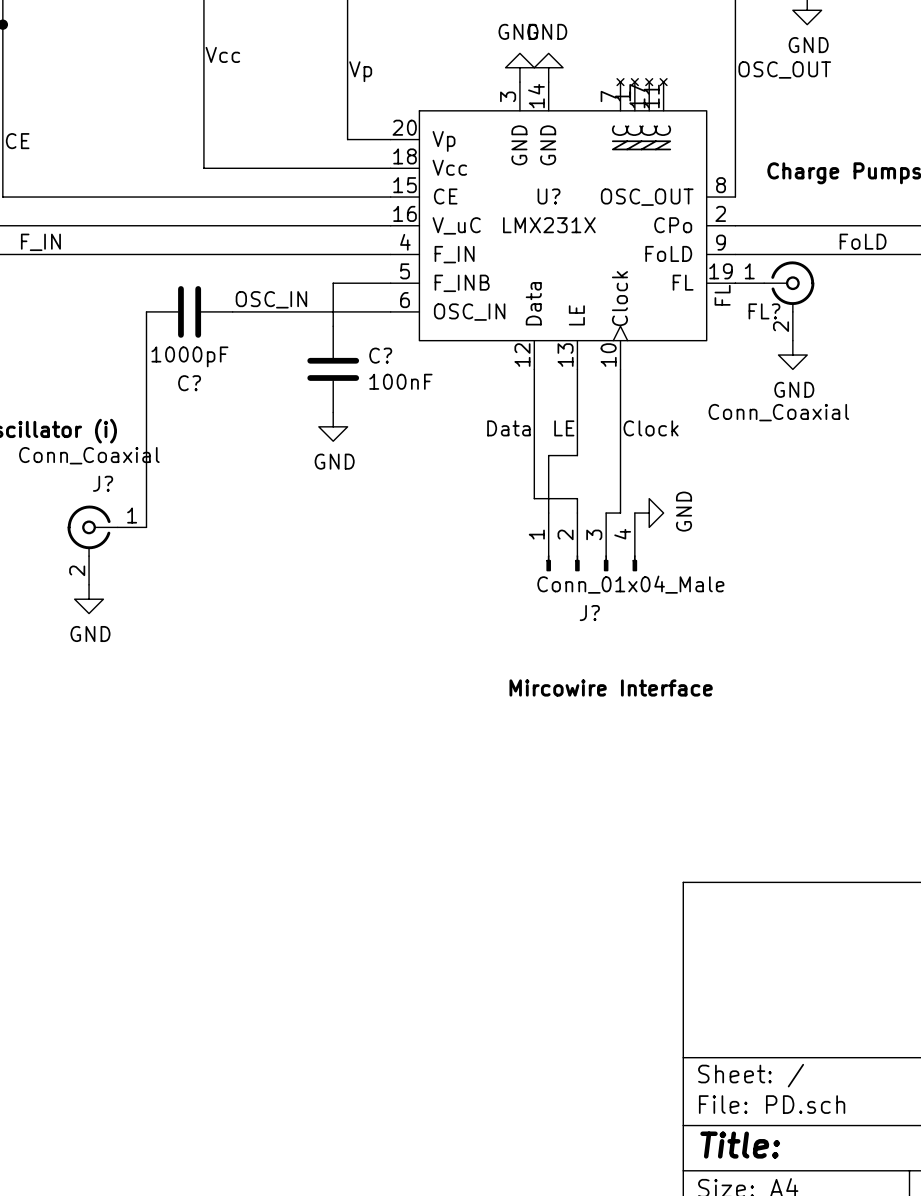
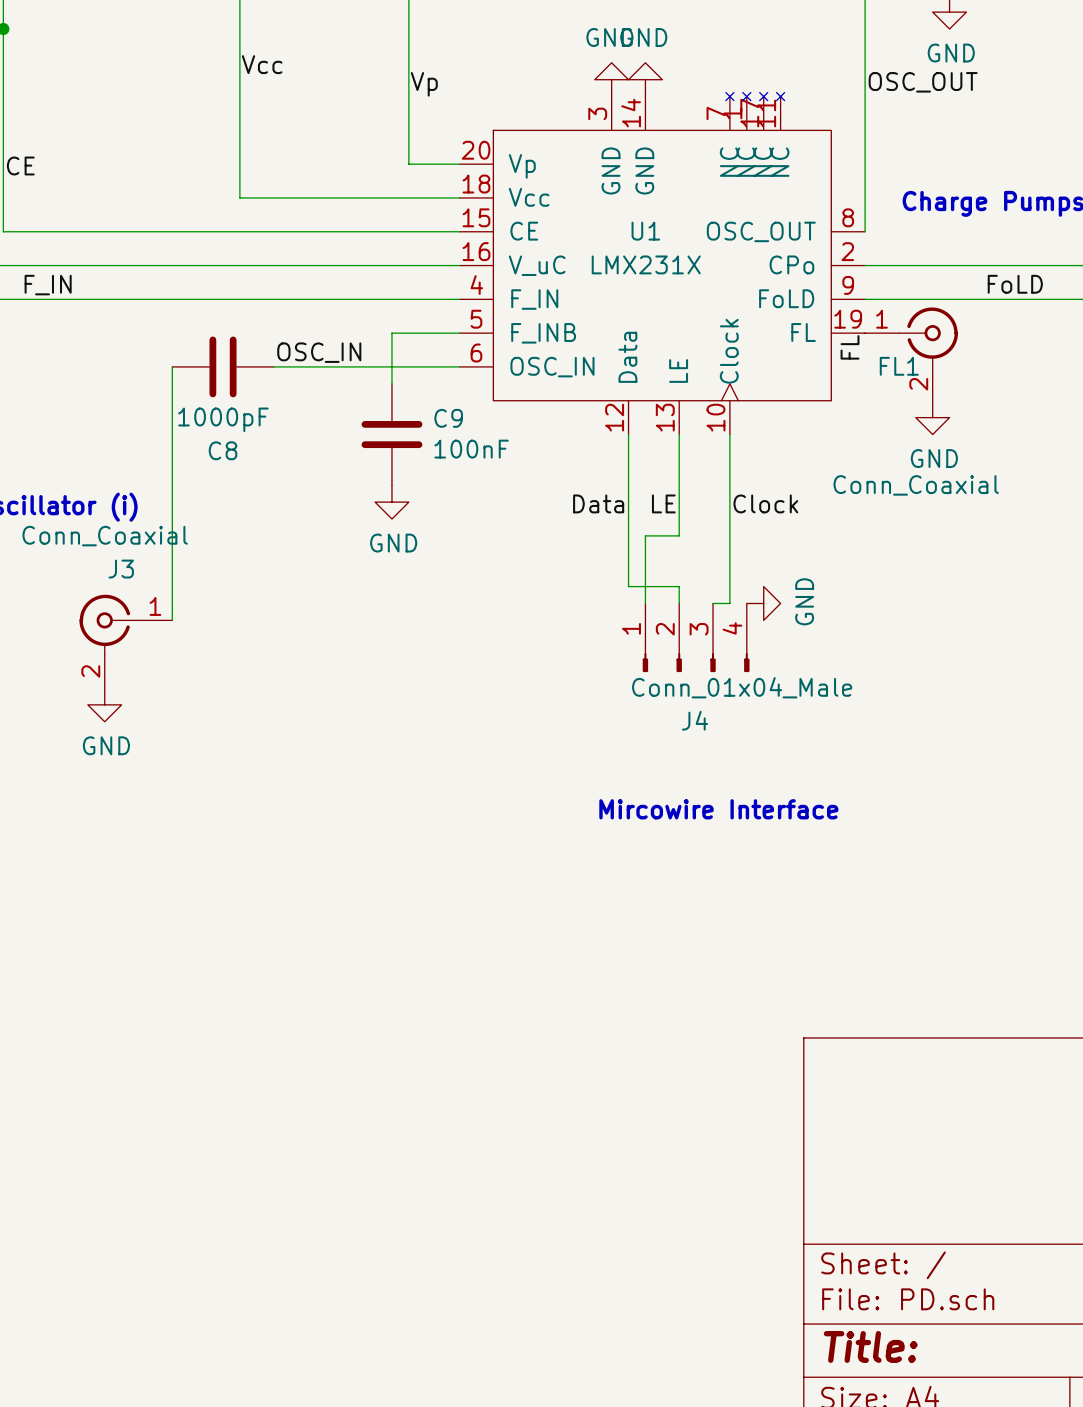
U? name: U? (549, 196) -> U1 (645, 231)
FL? name: FL? (764, 311) -> FL1 (899, 366)
C? name: C? (380, 355) -> C9 (448, 418)
C? name: C? (189, 383) -> C8 (223, 450)
J? name: J? (103, 483) -> J3 (121, 569)
J? name: J? (589, 613) -> J4 (695, 720)

